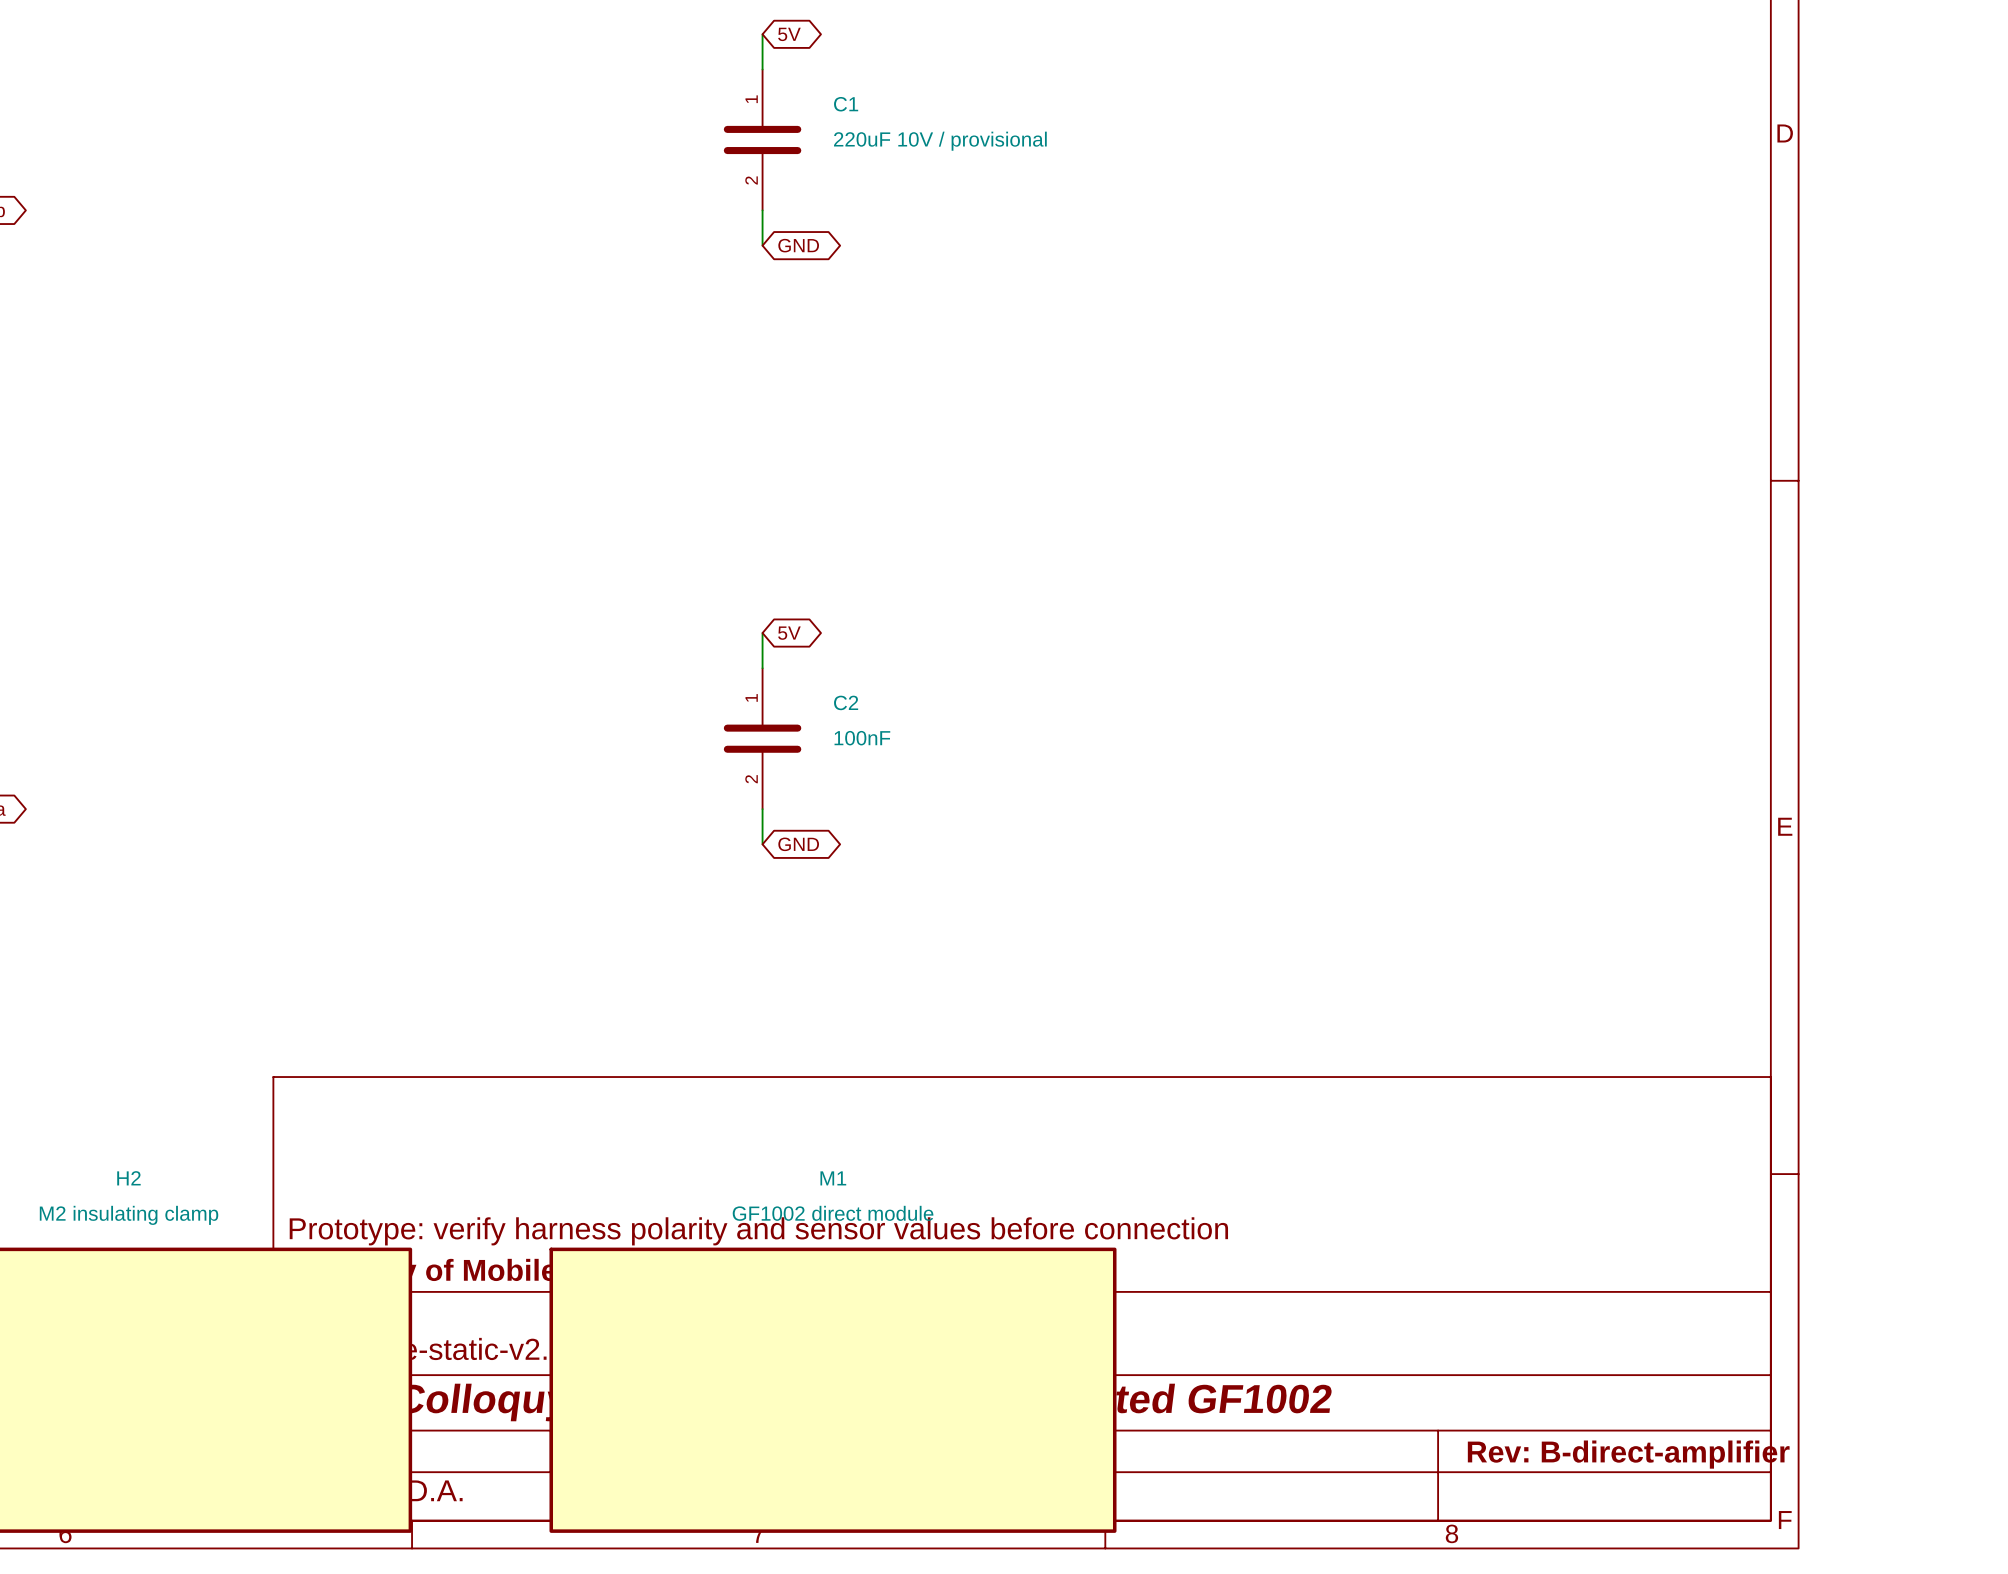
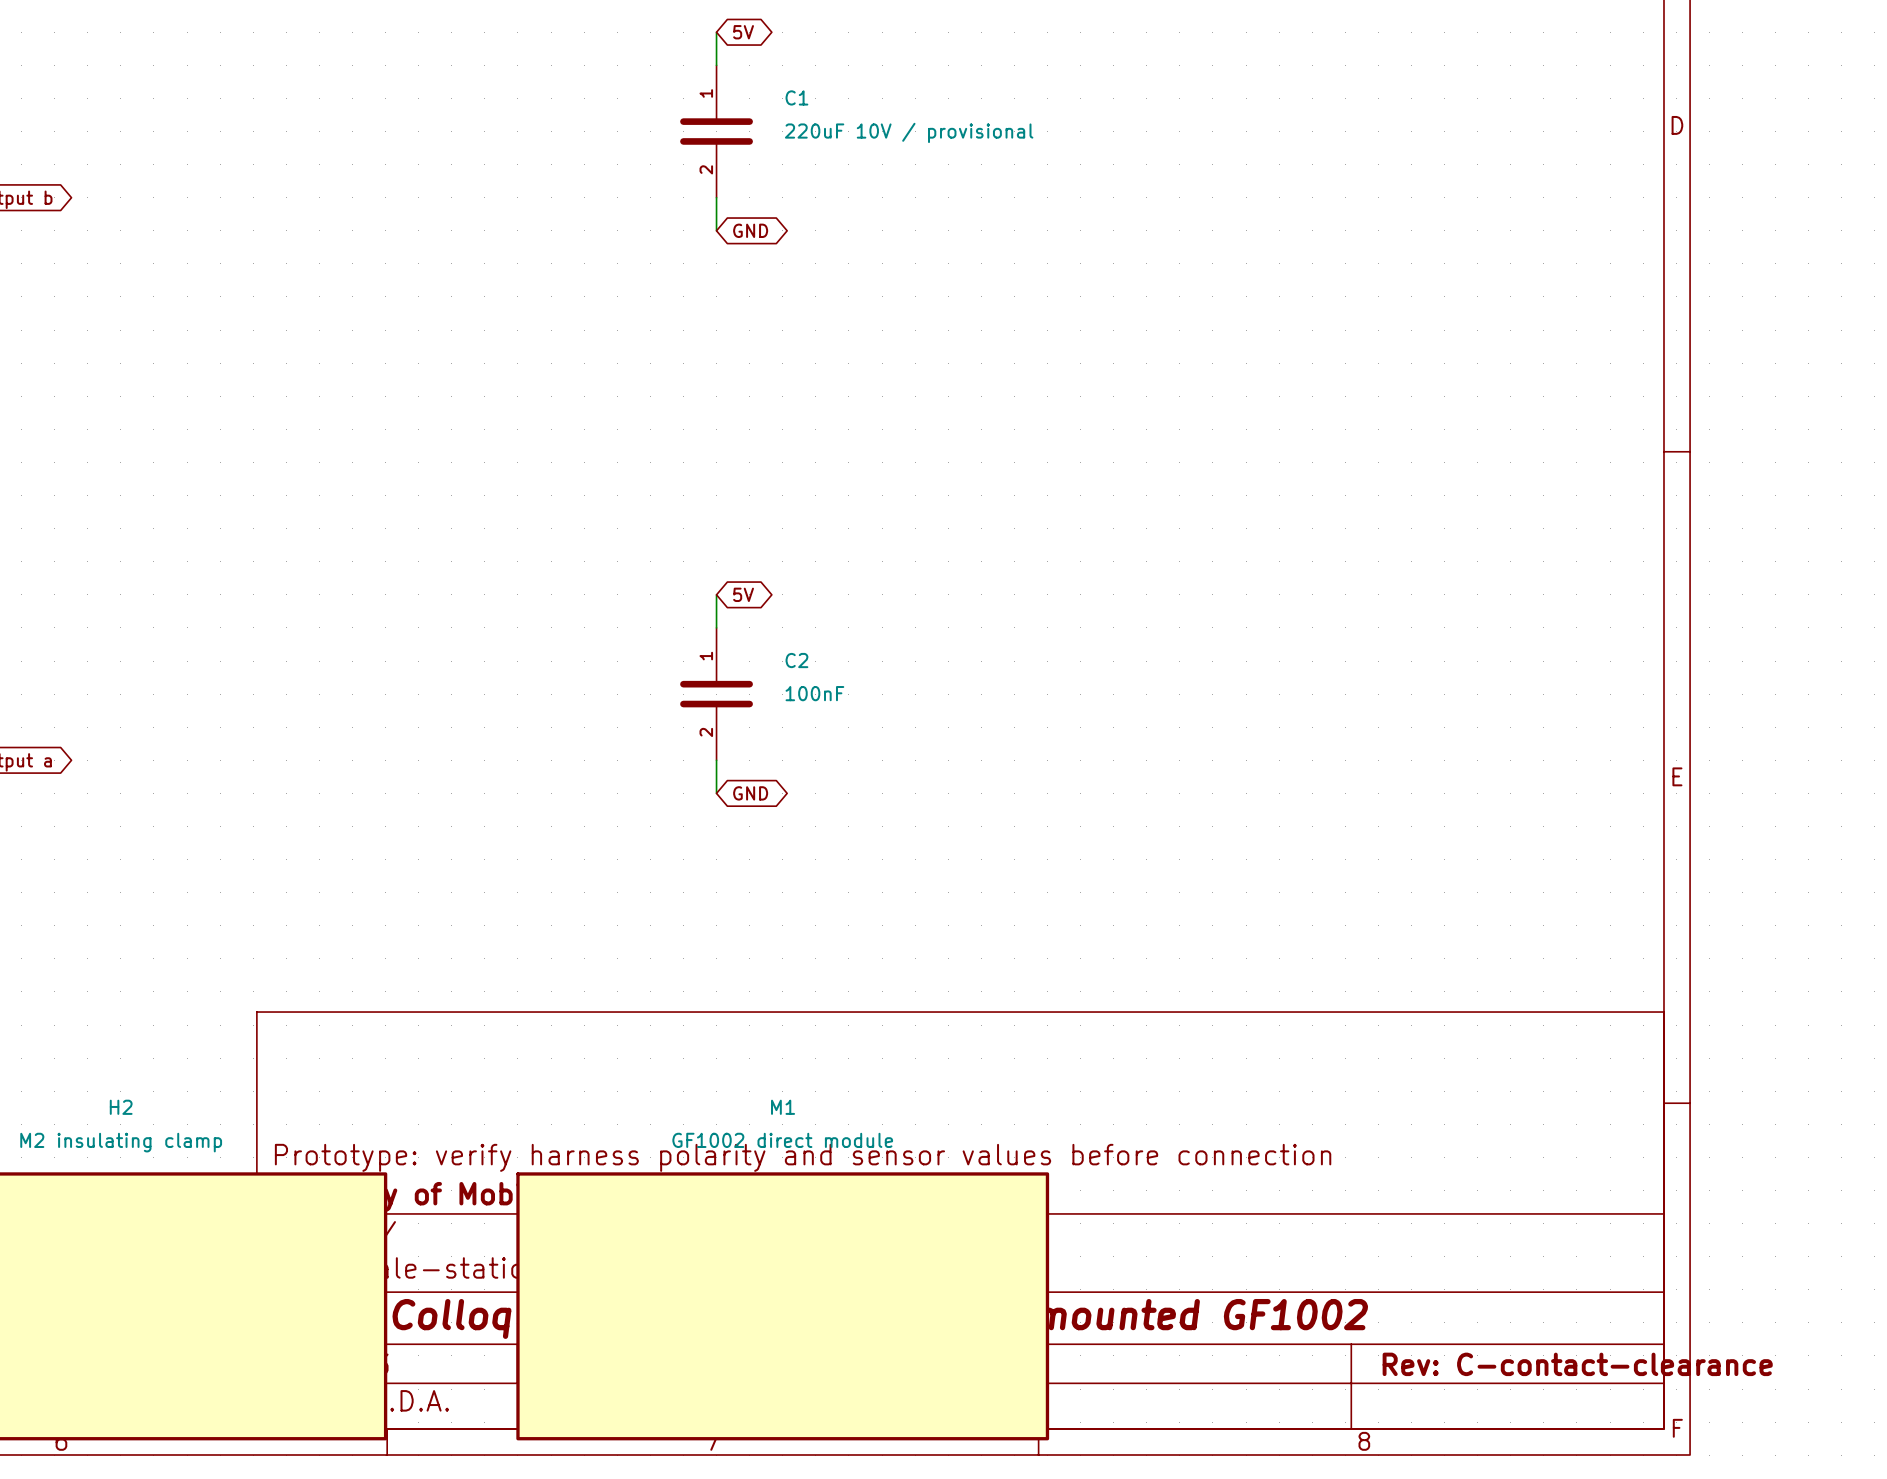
title block: Rev: B-direct-amplifier (1628, 1454) -> Rev: C-contact-clearance (1577, 1364)

